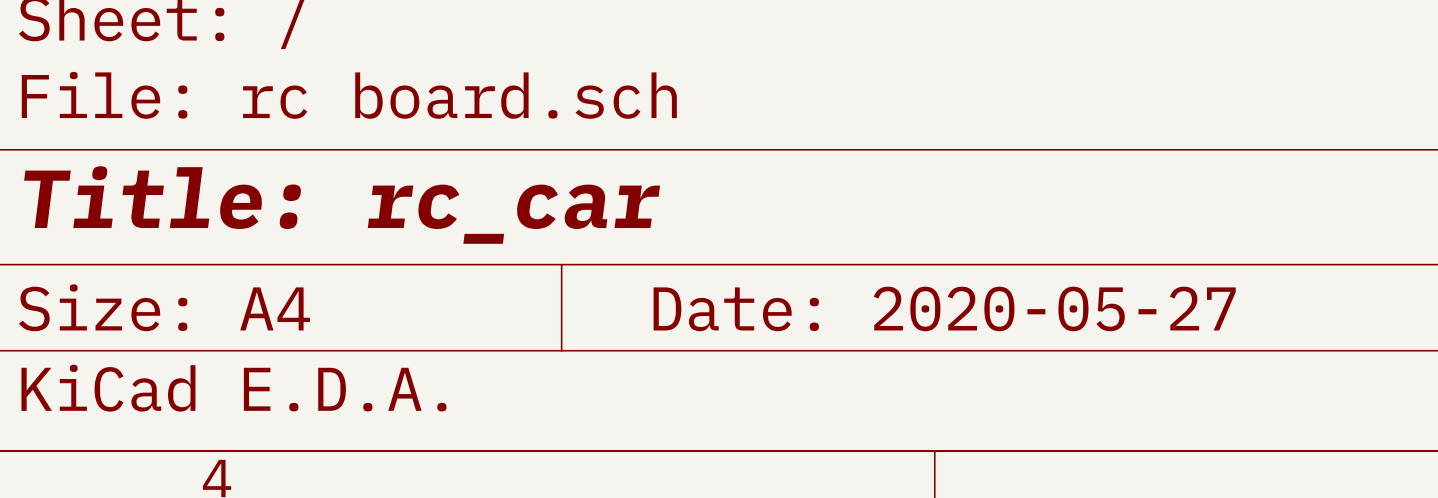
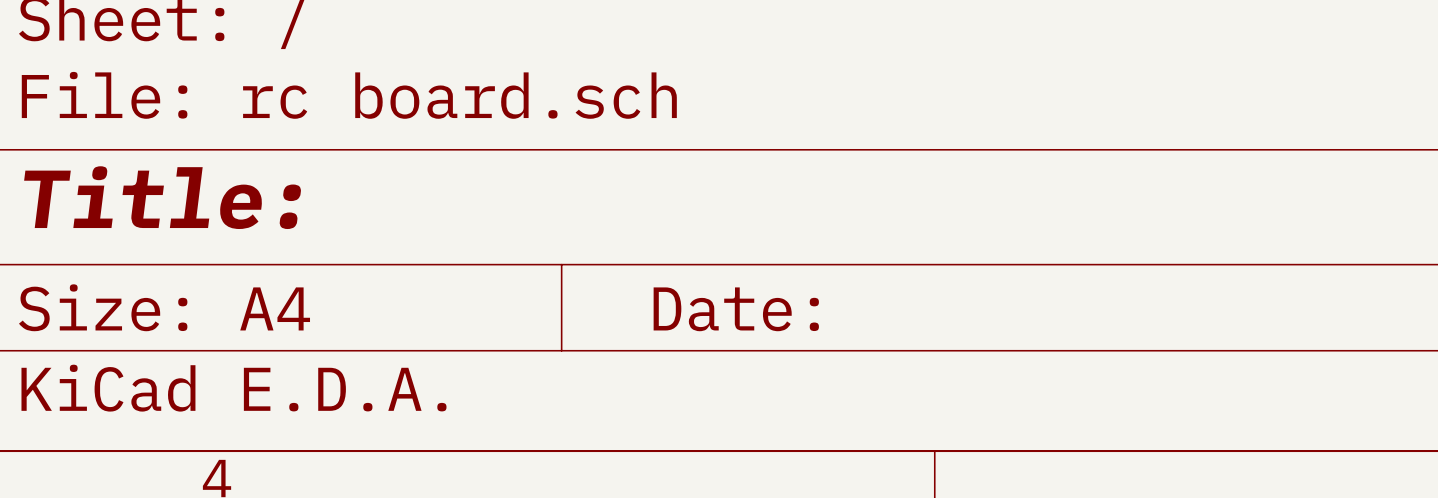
title block: Title: rc_car (342, 205) -> Title: (162, 197)
title block: Date: 2020-05-27 (944, 308) -> Date: (736, 309)

